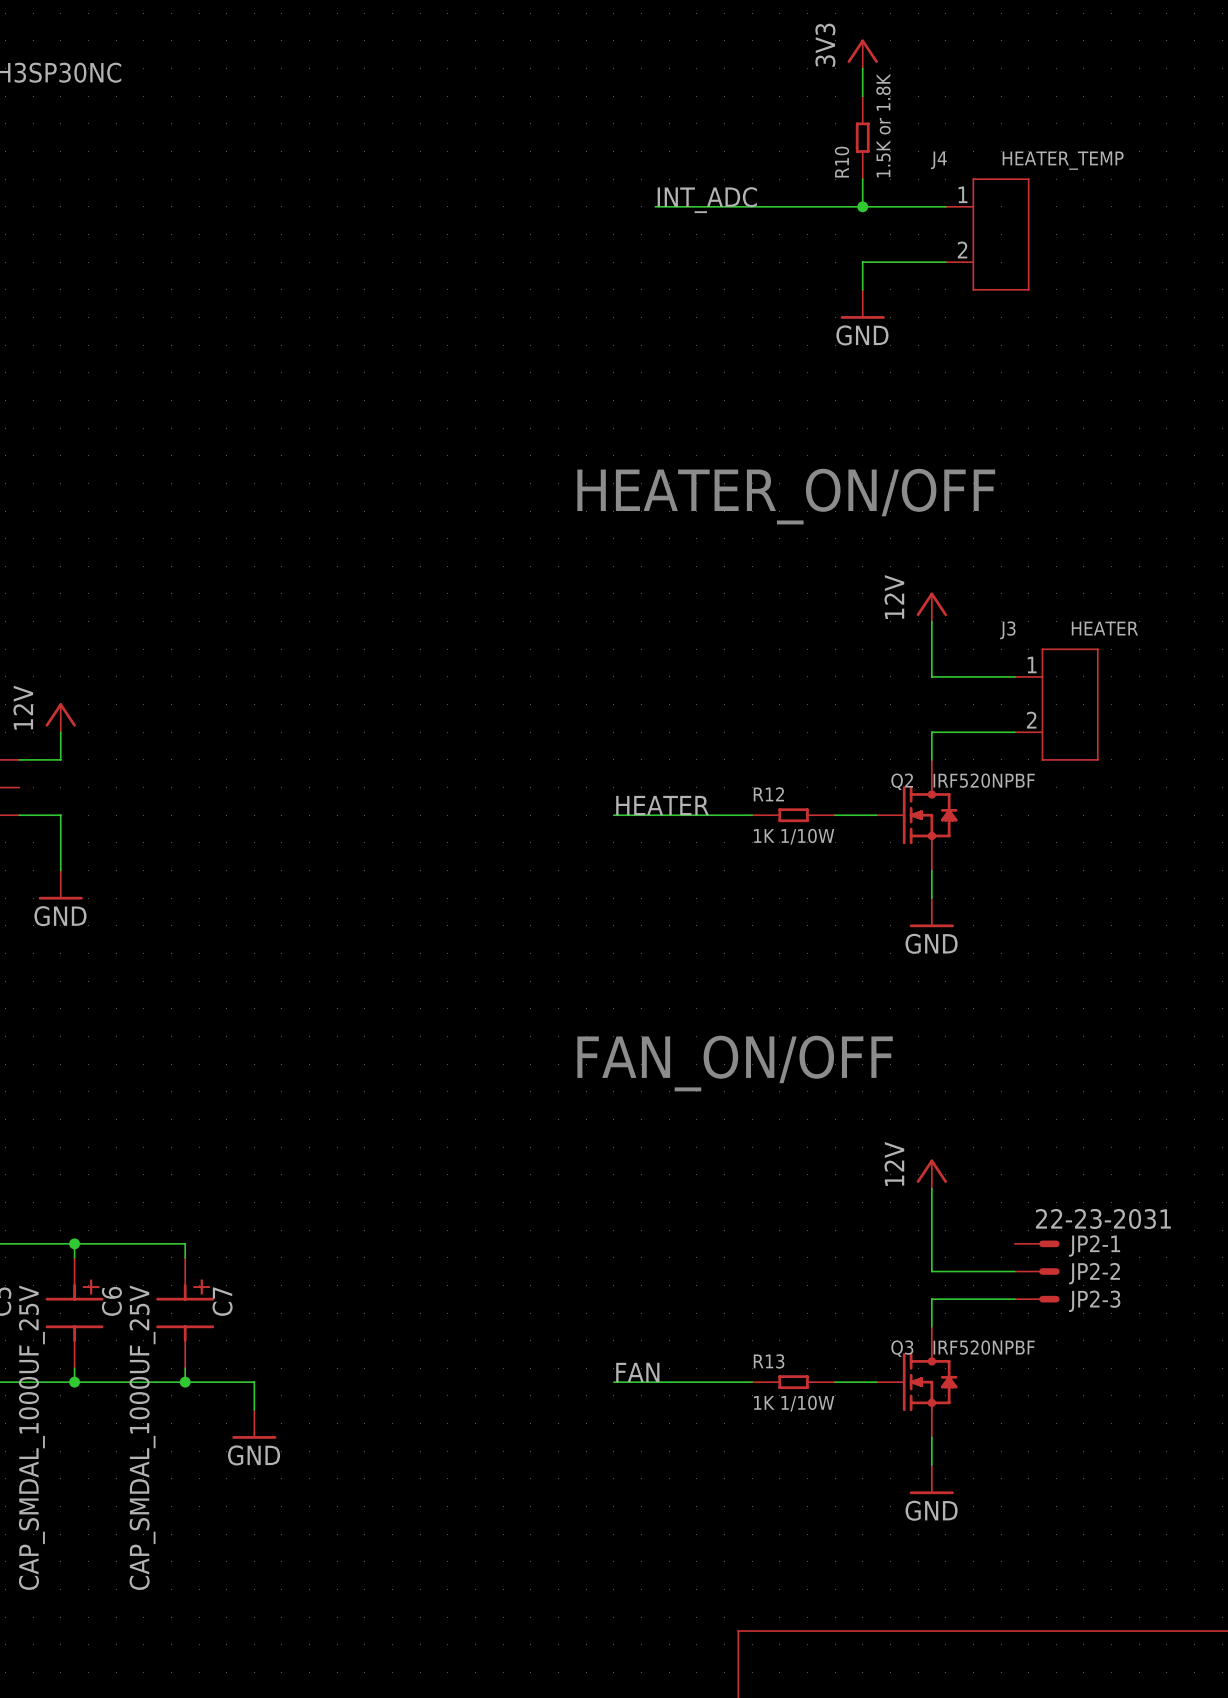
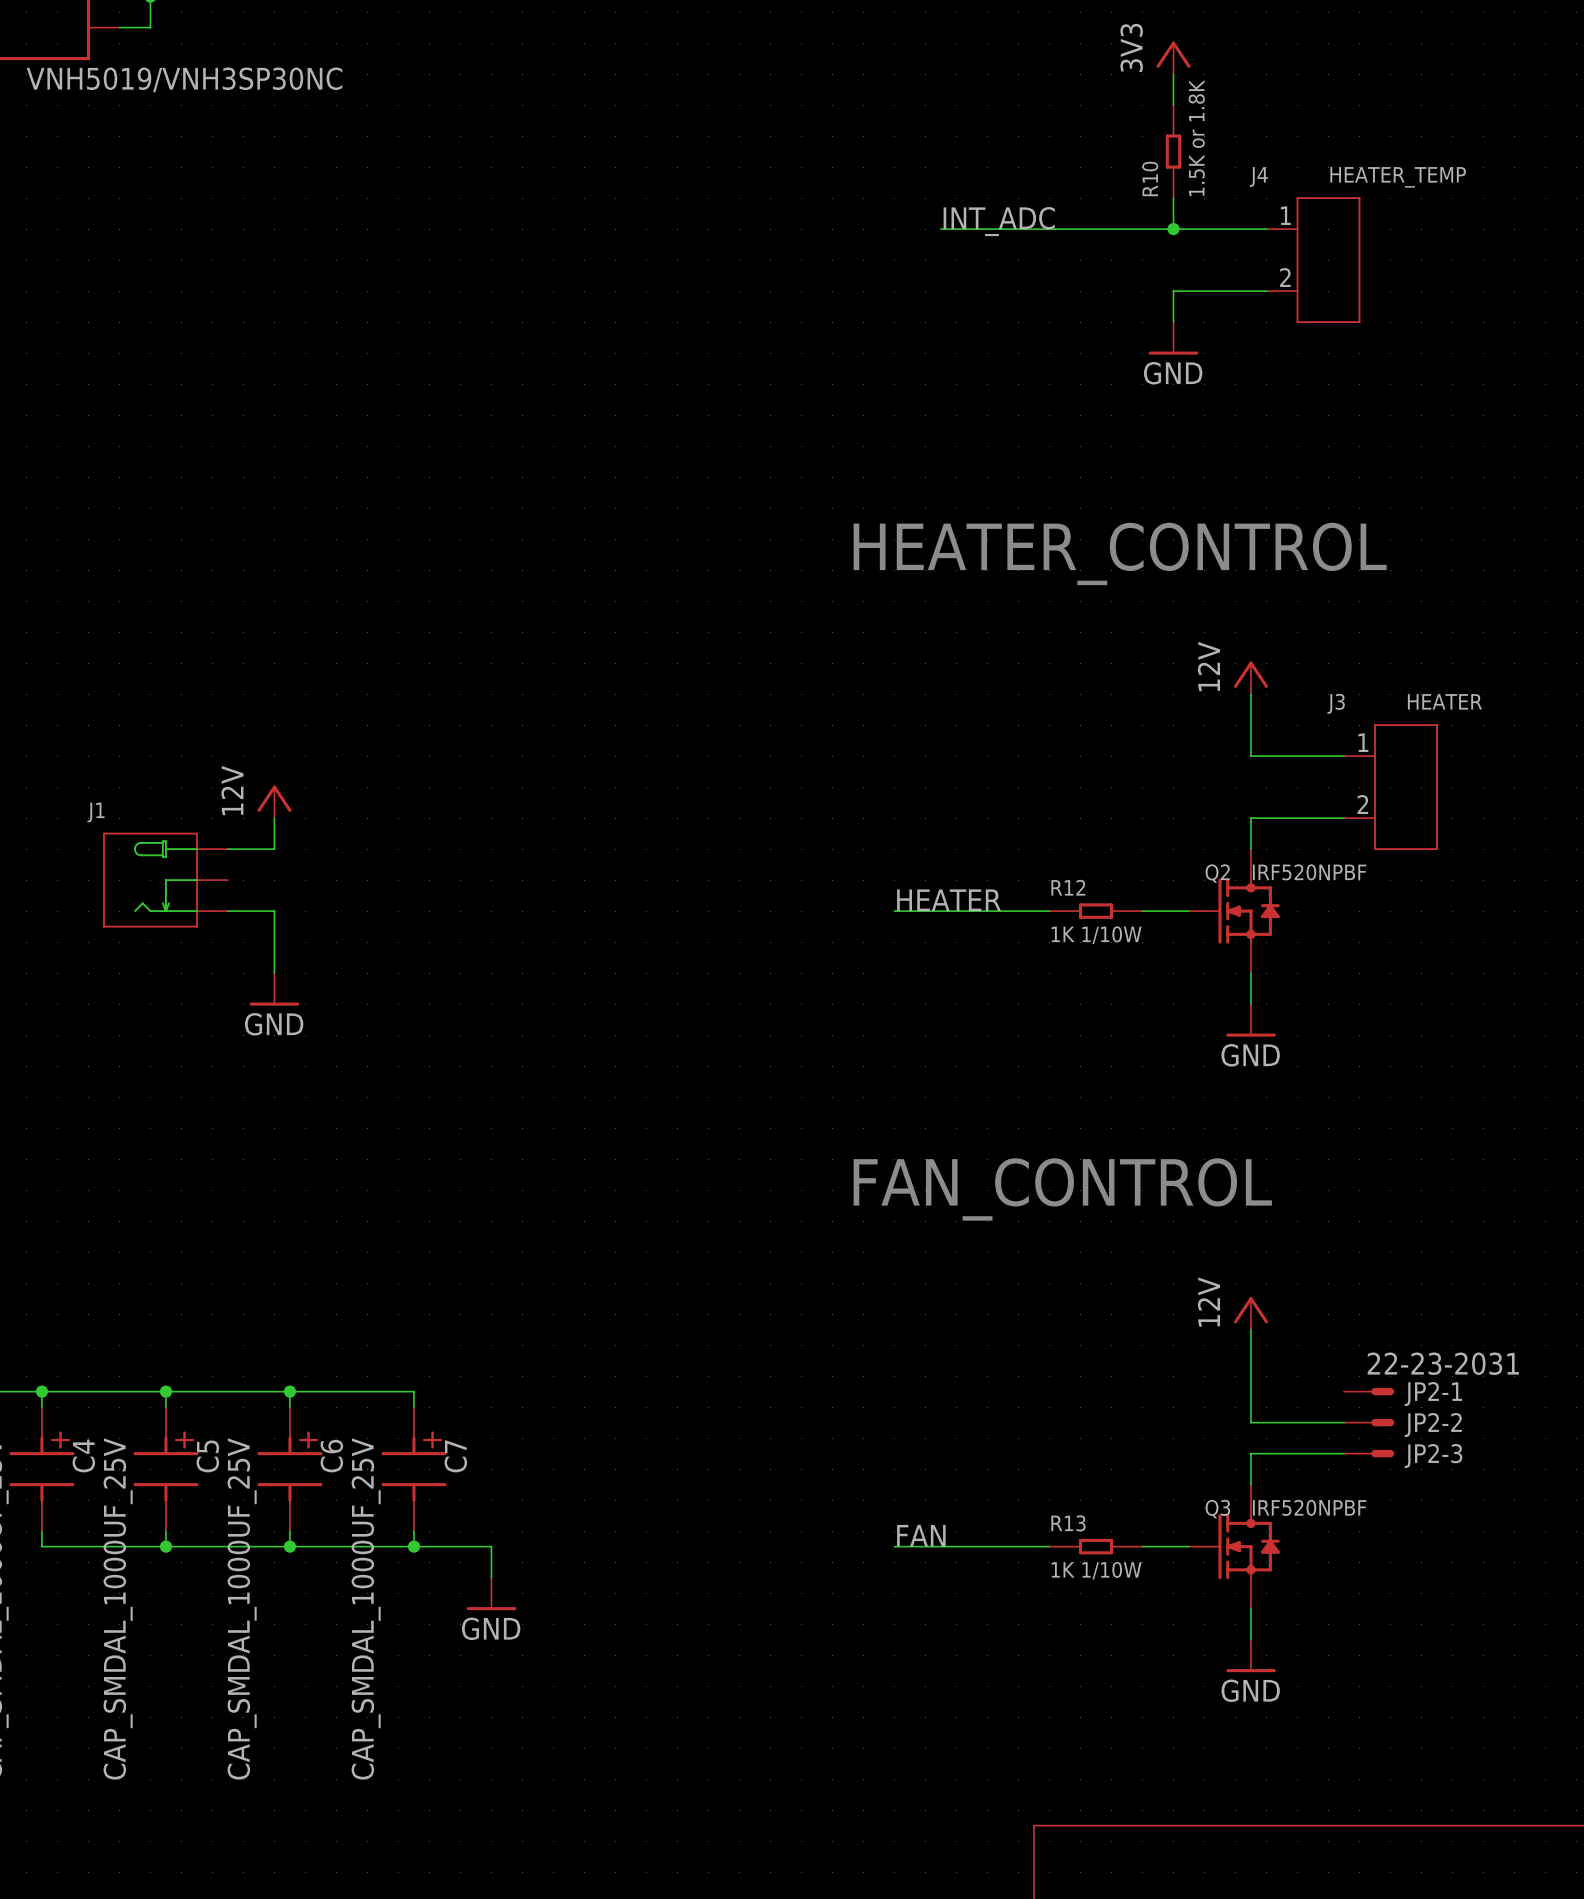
text: HEATER_ON/OFF (786, 496) -> HEATER_CONTROL (1120, 553)
text: FAN_ON/OFF (735, 1063) -> FAN_CONTROL (1062, 1189)

